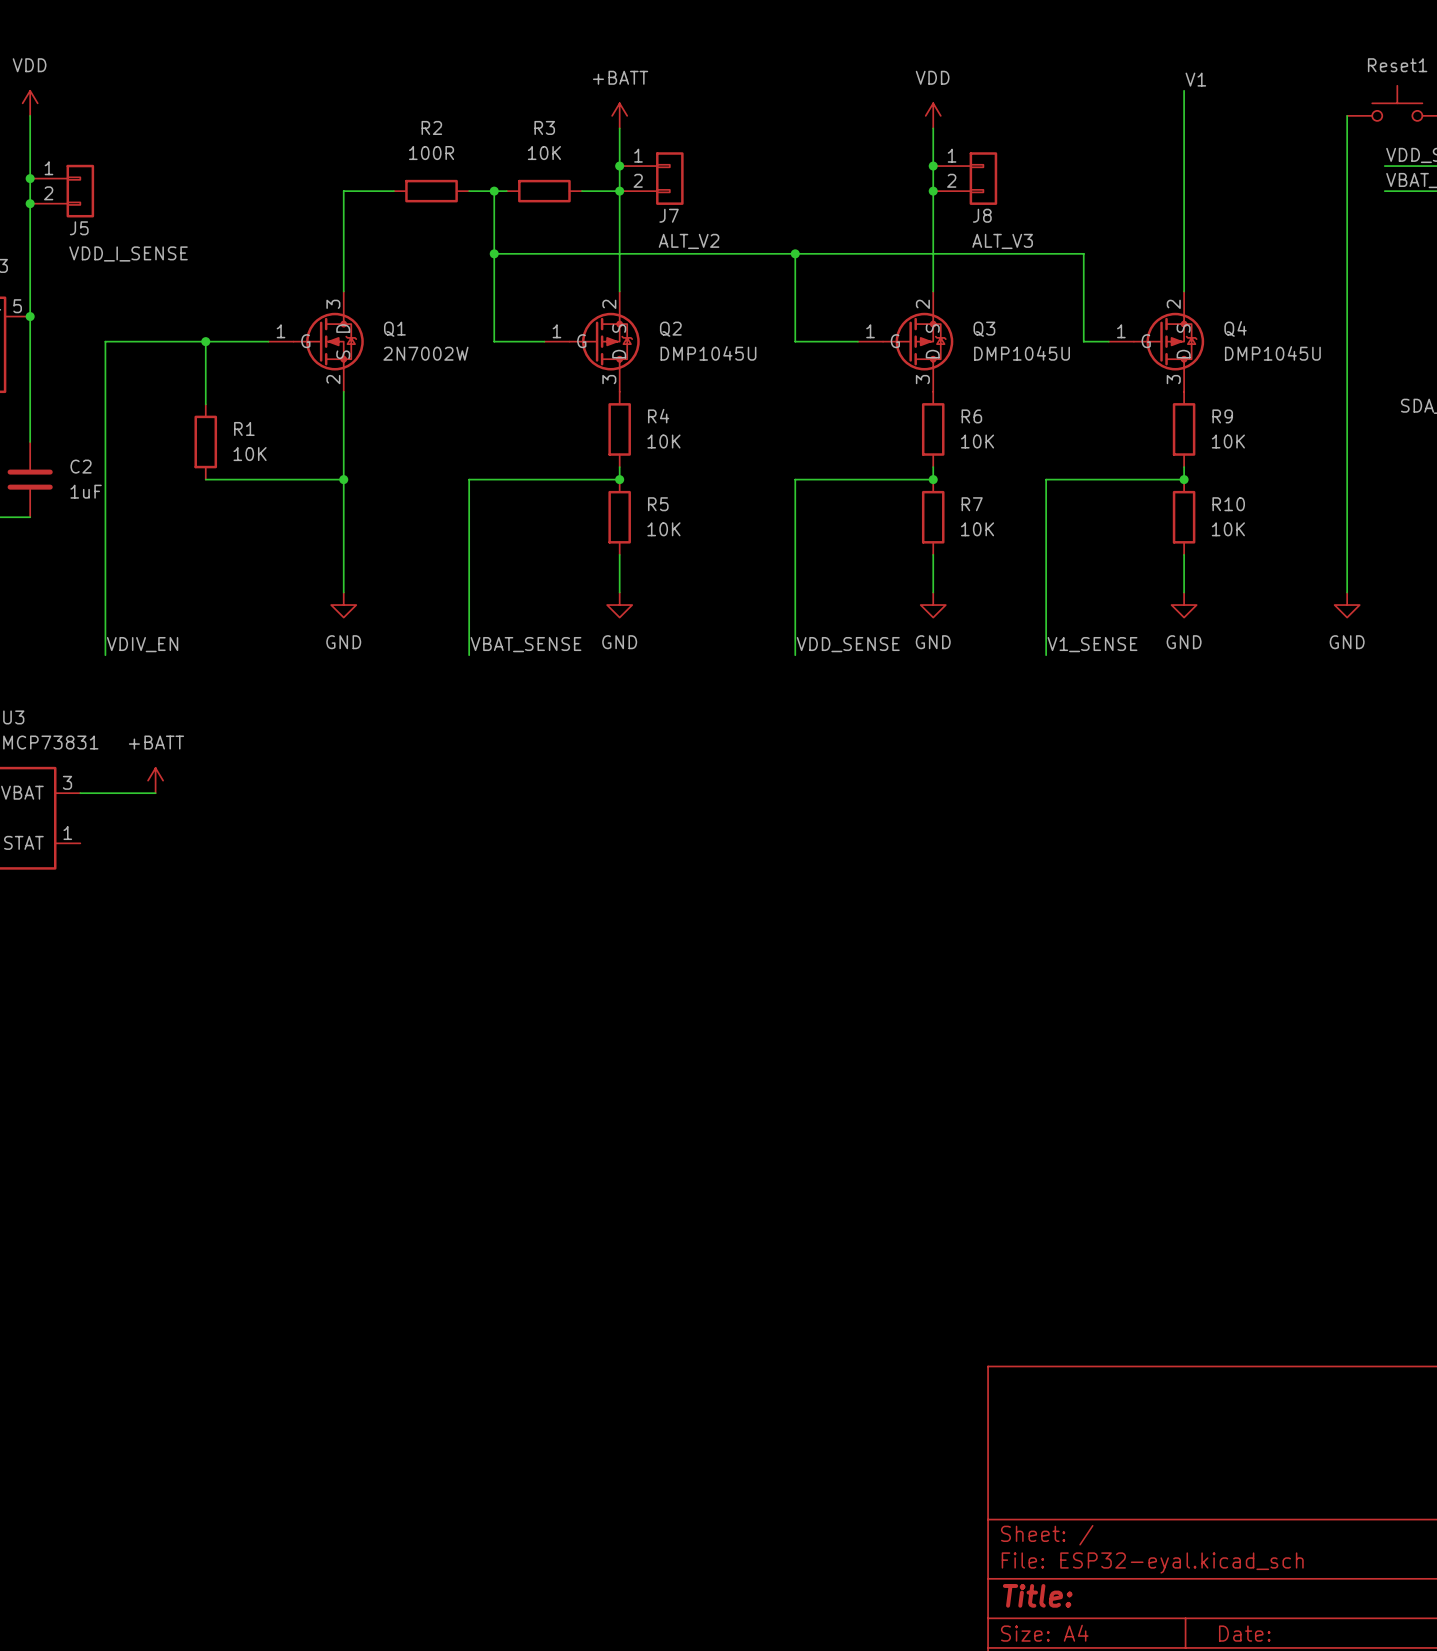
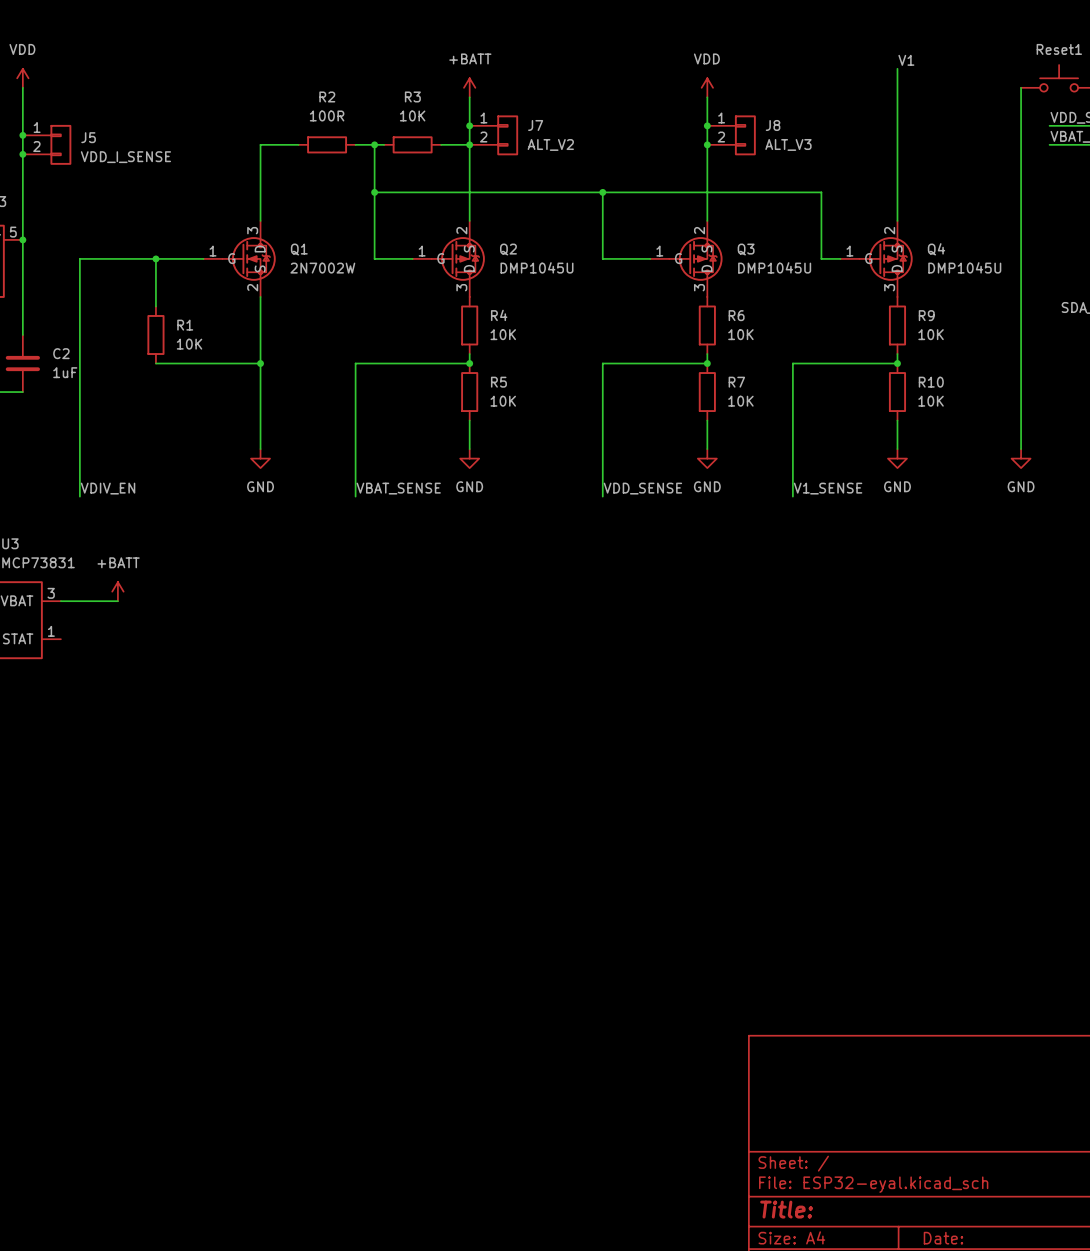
J7 name position: J7 (669, 215) -> J7 (535, 125)
J8 name position: J8 (982, 215) -> J8 (773, 125)
J5 name position: J5 (79, 228) -> J5 (88, 137)
J7 value position: ALT_V2 (689, 241) -> ALT_V2 (550, 144)
J8 value position: ALT_V3 (1002, 241) -> ALT_V3 (788, 144)
J5 value position: VDD_I_SENSE (128, 253) -> VDD_I_SENSE (125, 157)

